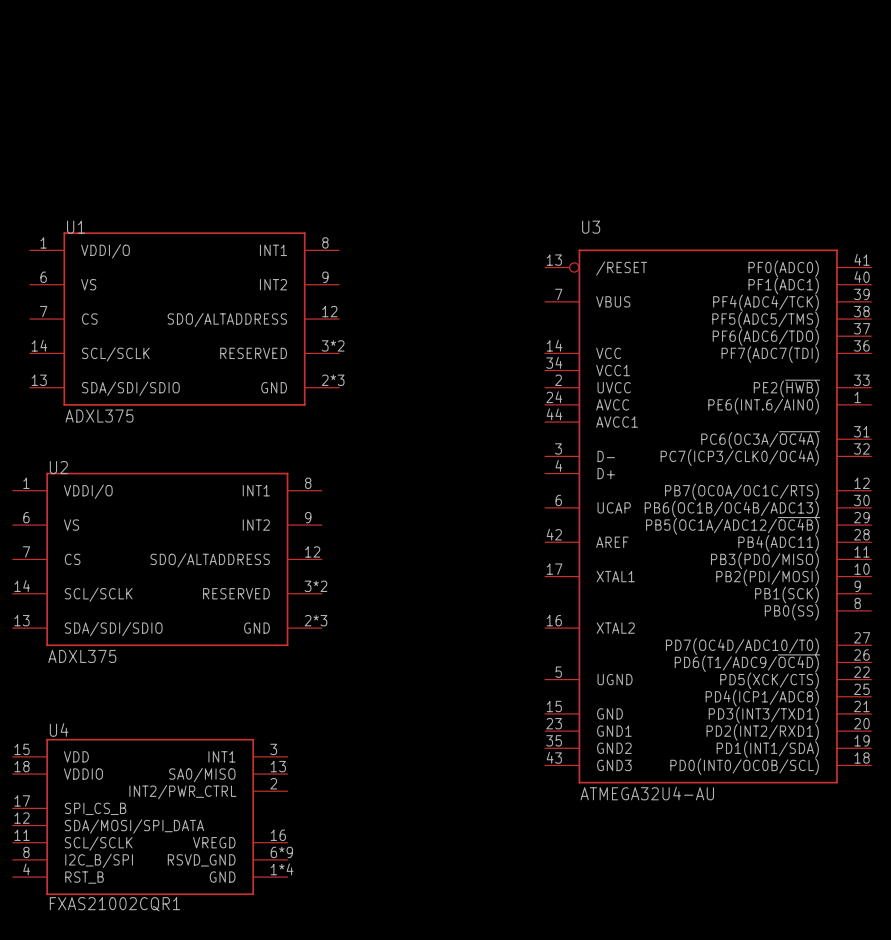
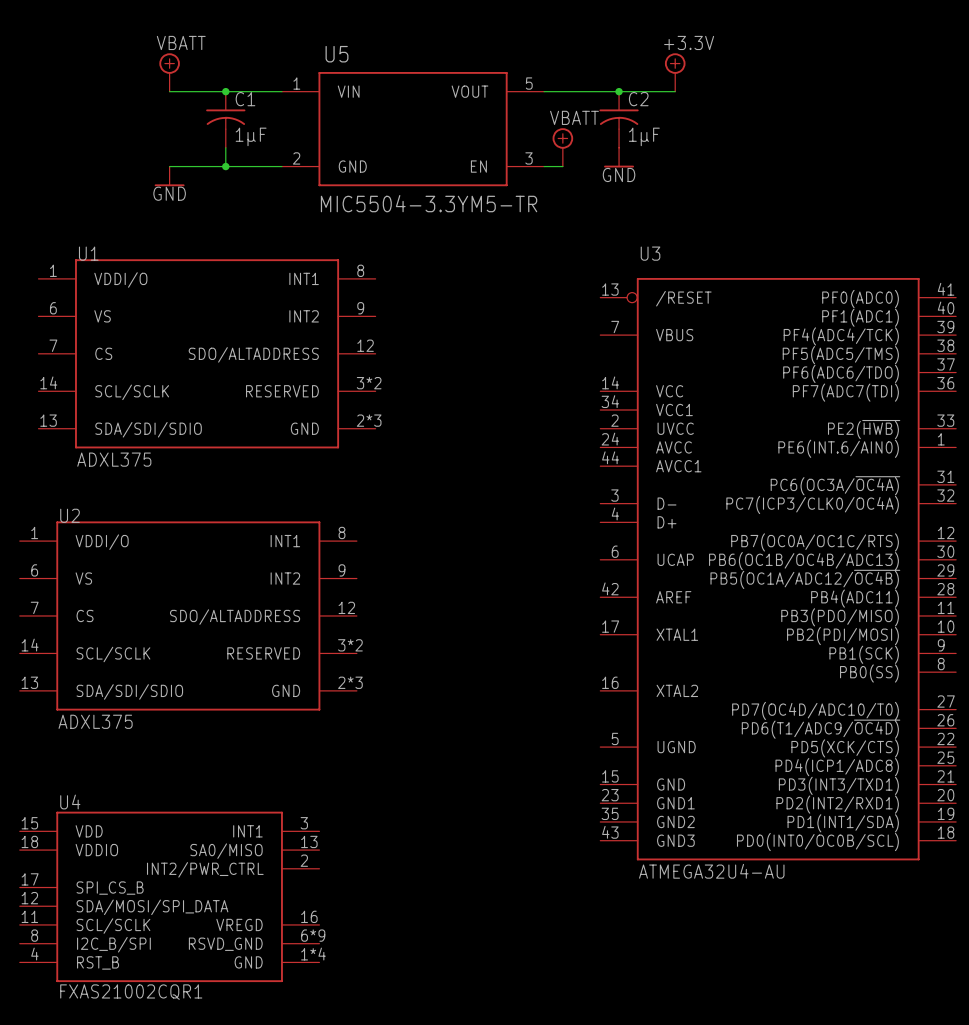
power symbol: none -> VBATT (169, 72)
power symbol: none -> +3.3V (675, 72)
wire: none -> (169, 91) (281, 91)
junction: none -> (225, 91)
wire: none -> (544, 91) (675, 91)
junction: none -> (619, 91)
C1: none -> 1µF (225, 119)
C2: none -> 1µF (619, 119)
U5: none -> MIC5504-3.3YM5-TR (413, 129)
power symbol: none -> VBATT (562, 147)
wire: none -> (225, 147) (225, 166)
power symbol: none -> GND (619, 157)
wire: none -> (169, 166) (281, 166)
junction: none -> (225, 166)
wire: none -> (544, 166) (562, 166)
power symbol: none -> GND (169, 176)

